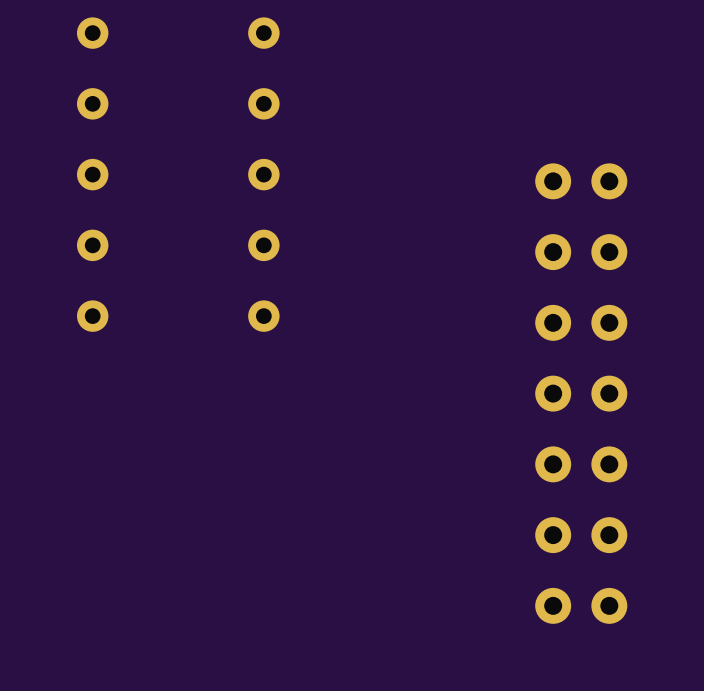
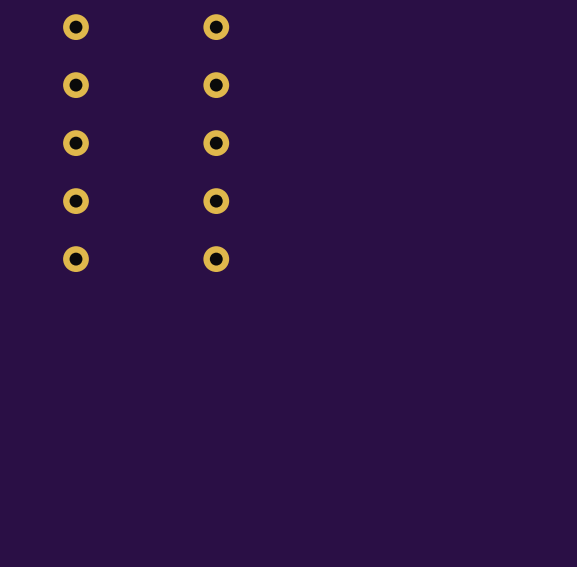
part: (581, 181) -> none
part: (581, 252) -> none
part: (581, 322) -> none
part: (581, 393) -> none
part: (581, 464) -> none
part: (581, 535) -> none
part: (581, 605) -> none

